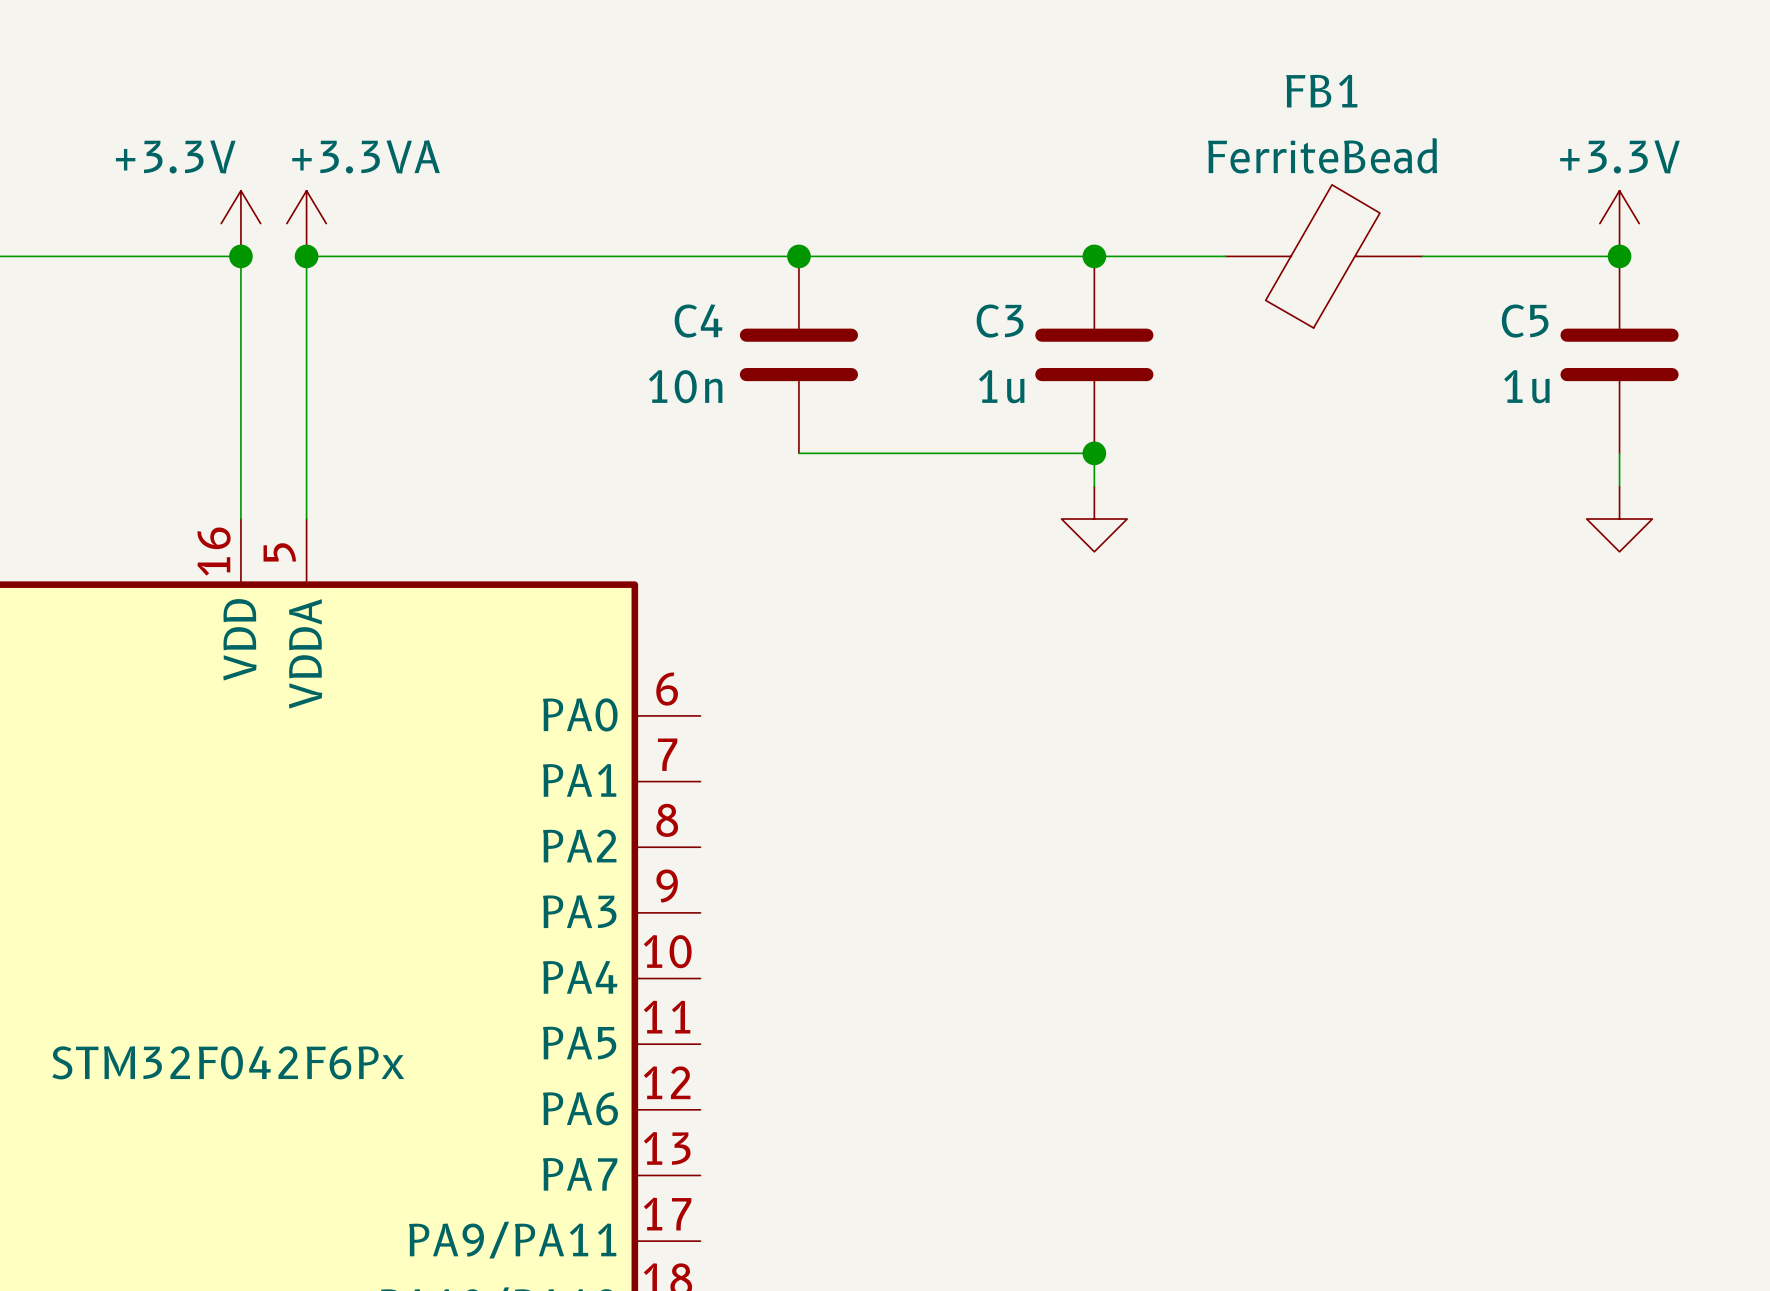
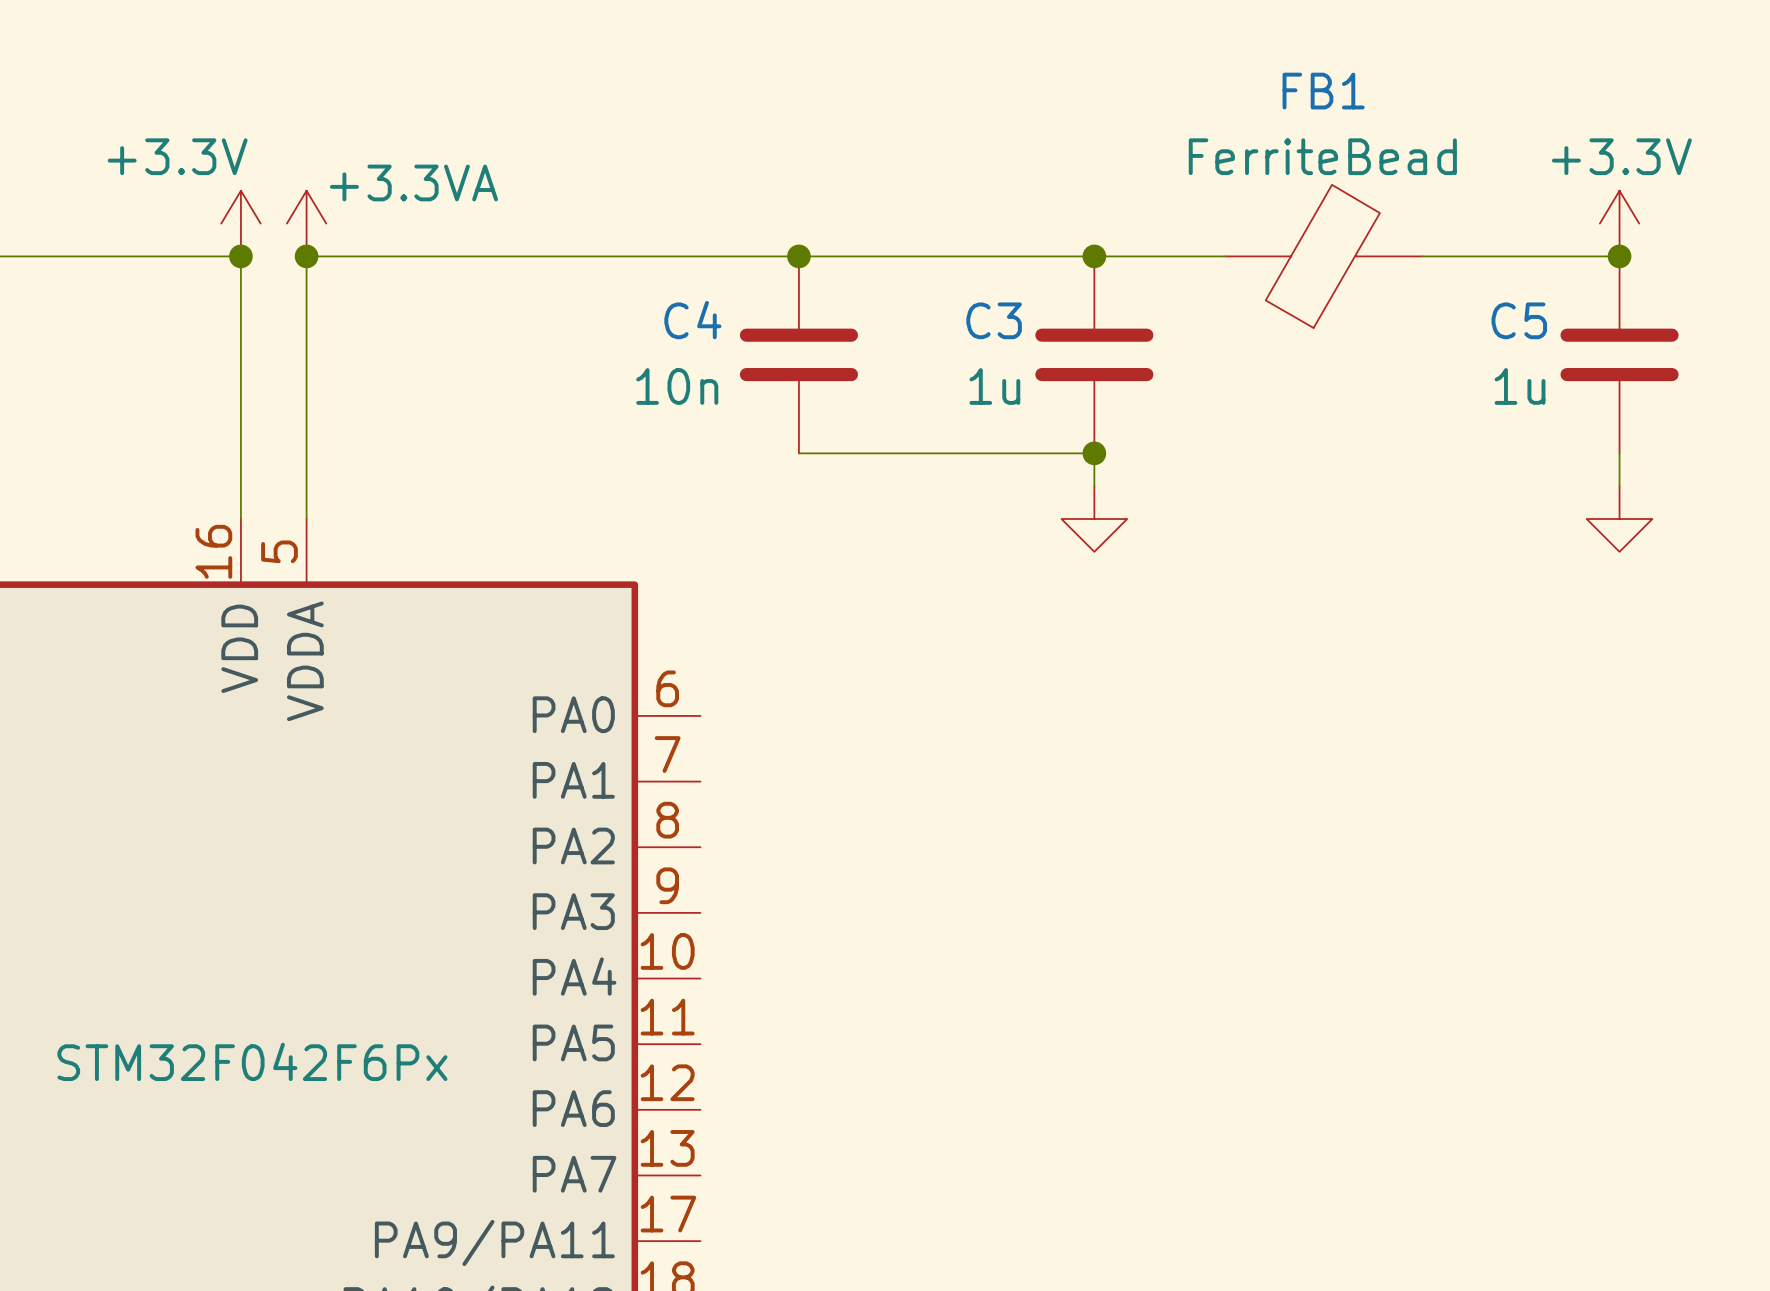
power symbol text position: +3.3VA (366, 156) -> +3.3VA (413, 182)

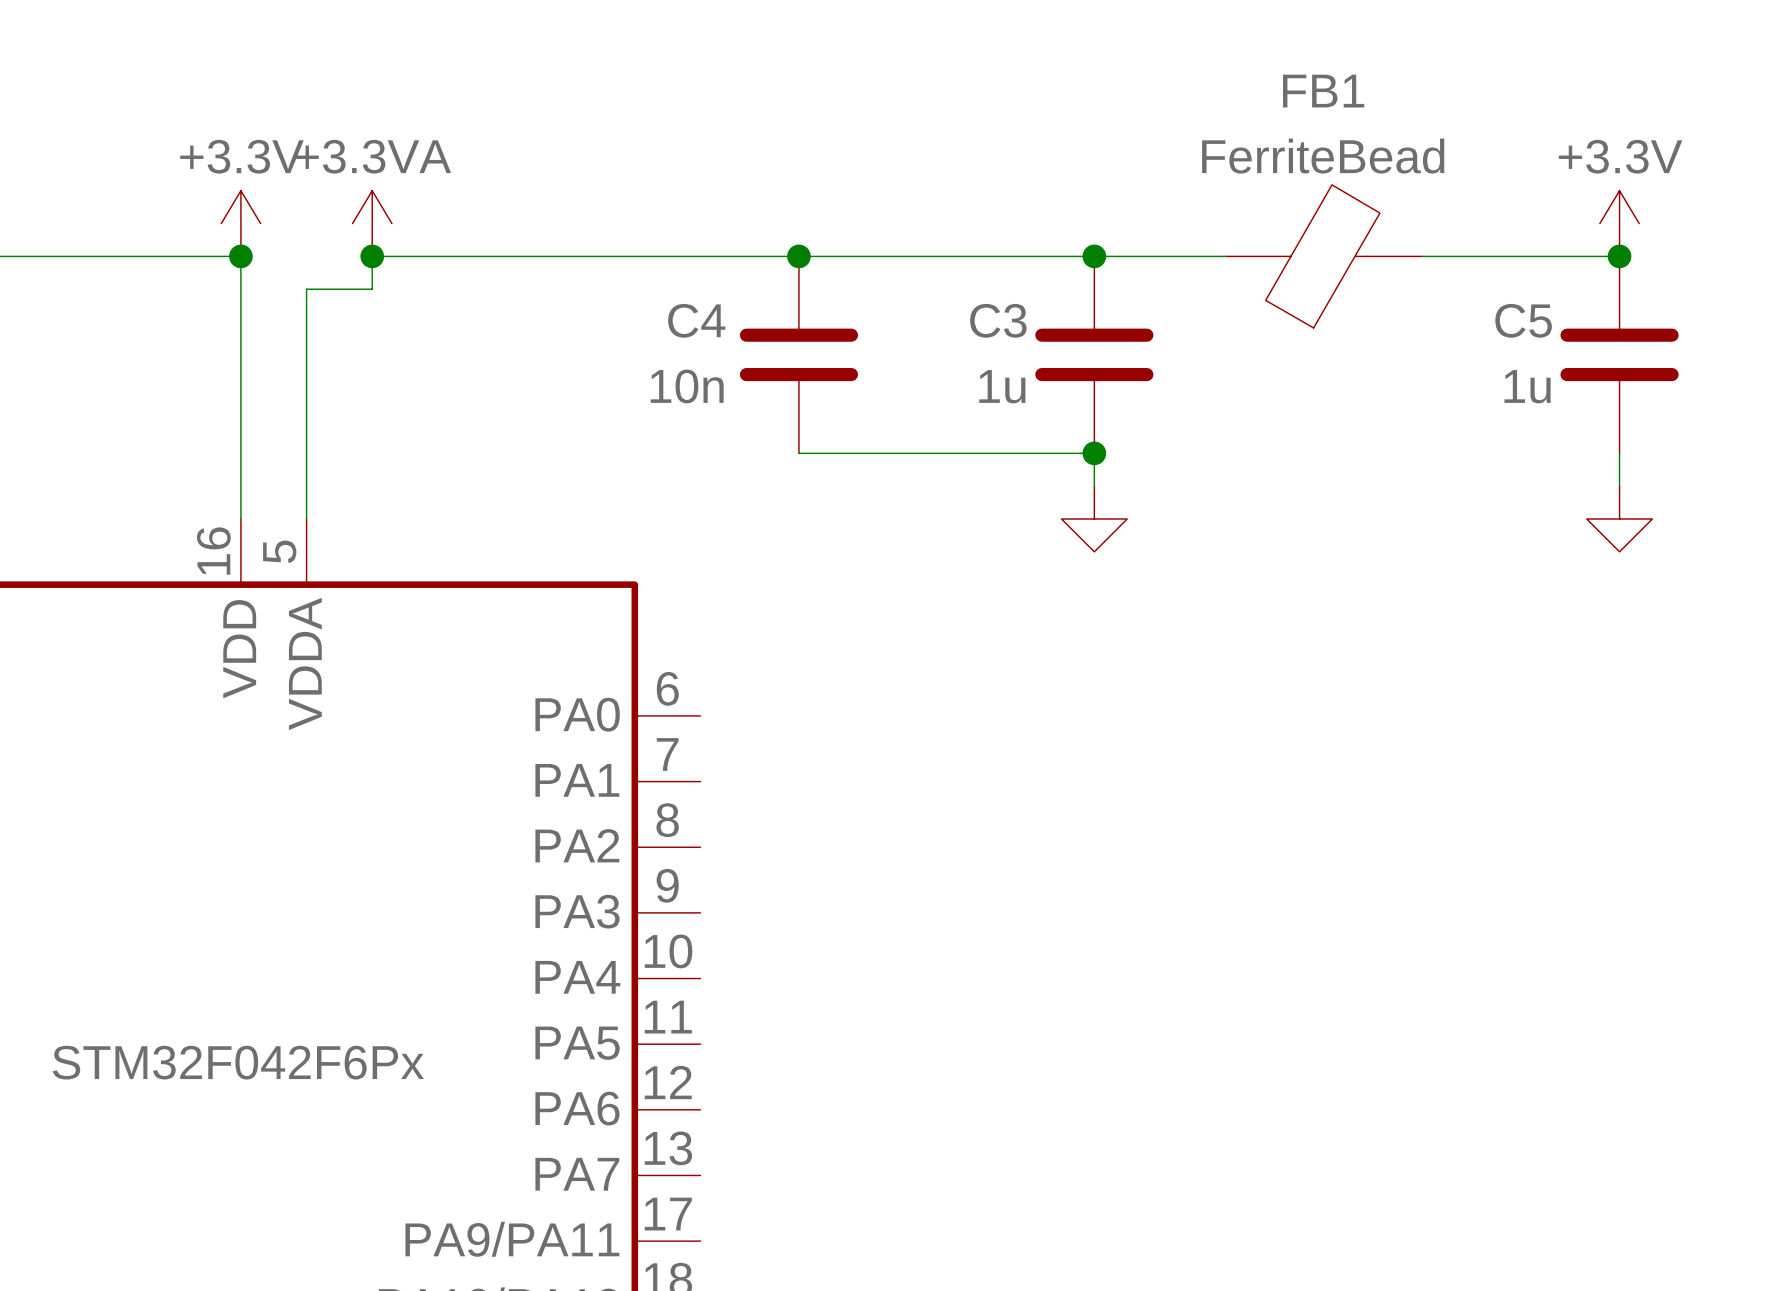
power symbol text position: +3.3V (177, 156) -> +3.3V (242, 156)
power symbol text position: +3.3VA (413, 182) -> +3.3VA (373, 156)
power symbol position: +3.3VA (306, 223) -> +3.3VA (372, 223)
junction position: (306, 256) -> (372, 256)
wire: (372, 256) (306, 256) (306, 289) -> (372, 256) (372, 289) (306, 289)

